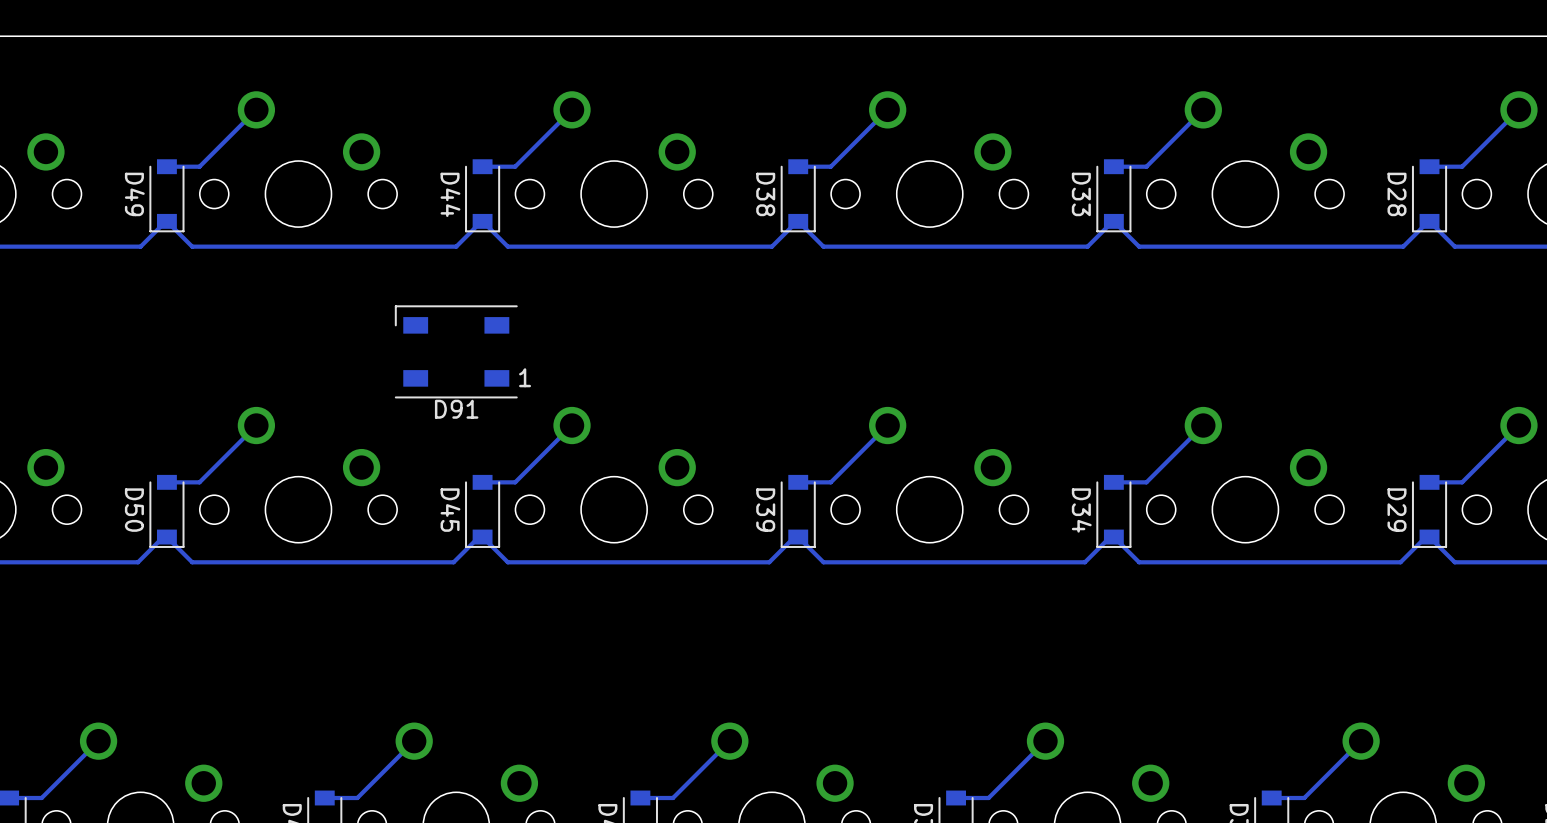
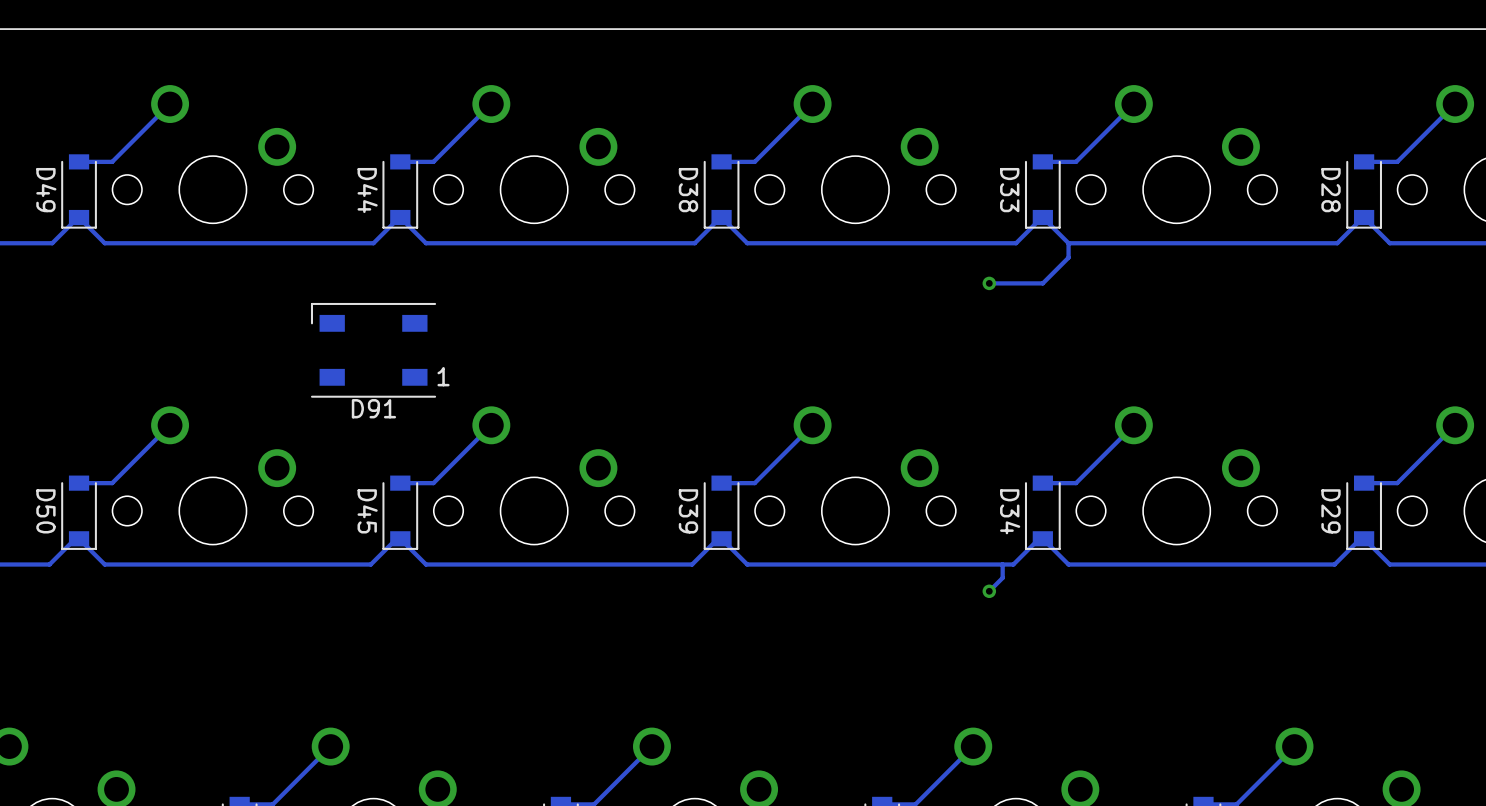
track: none -> (1068, 243) (1068, 257) (1042, 283) (989, 283)
via: none -> (989, 283)
track: none -> (1002, 564) (1002, 577) (989, 591)
via: none -> (989, 591)

